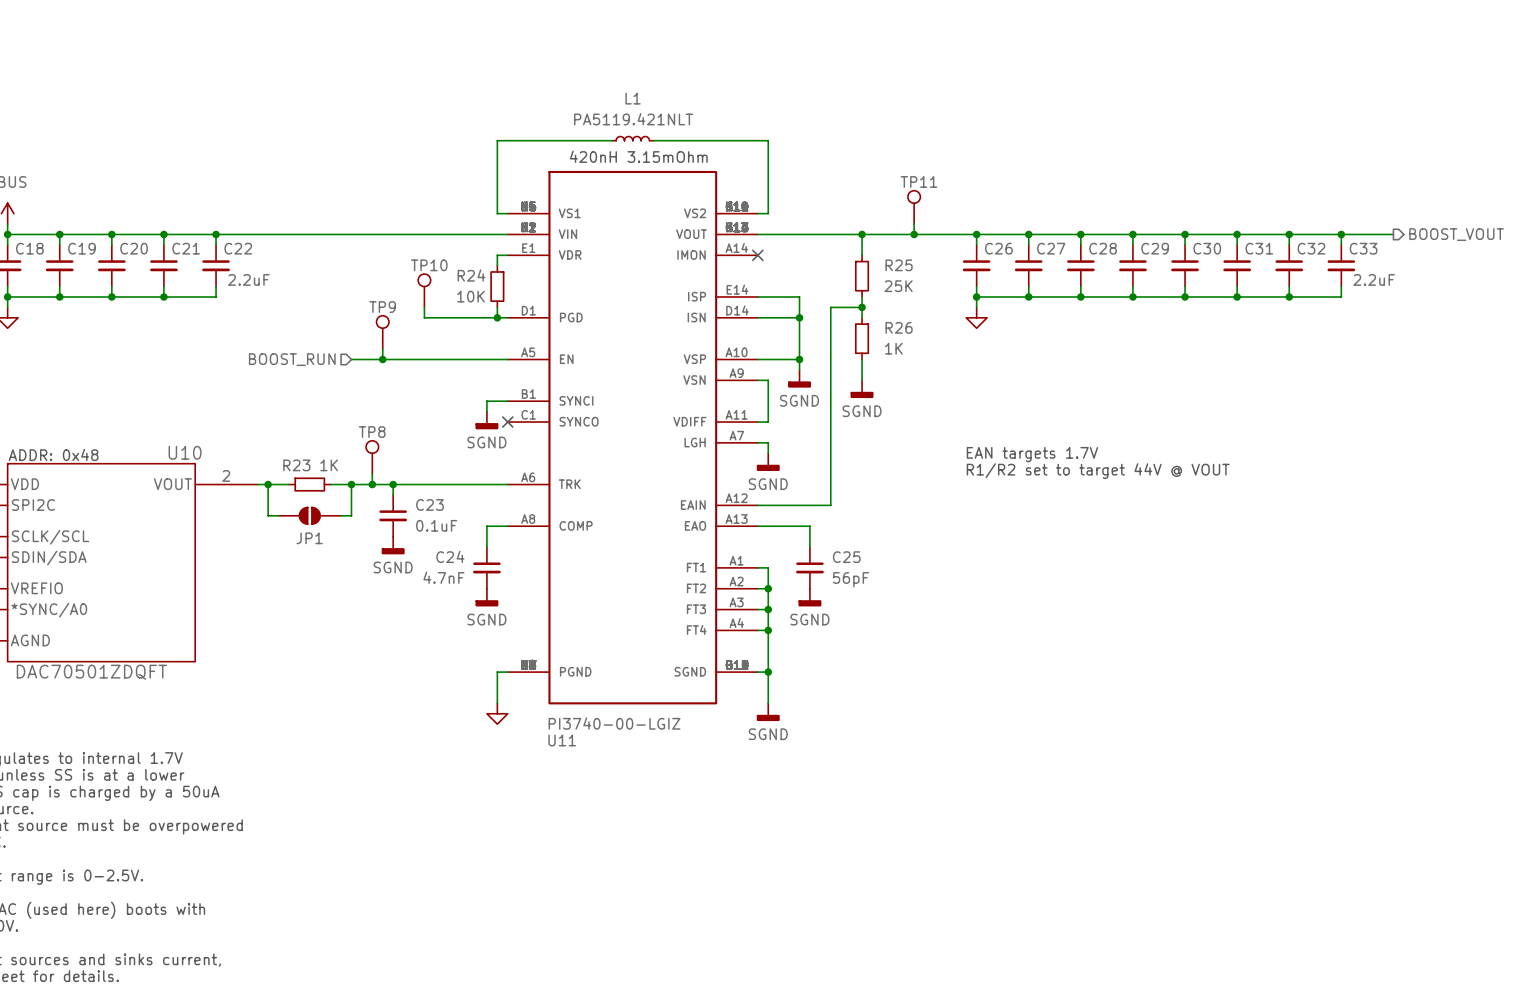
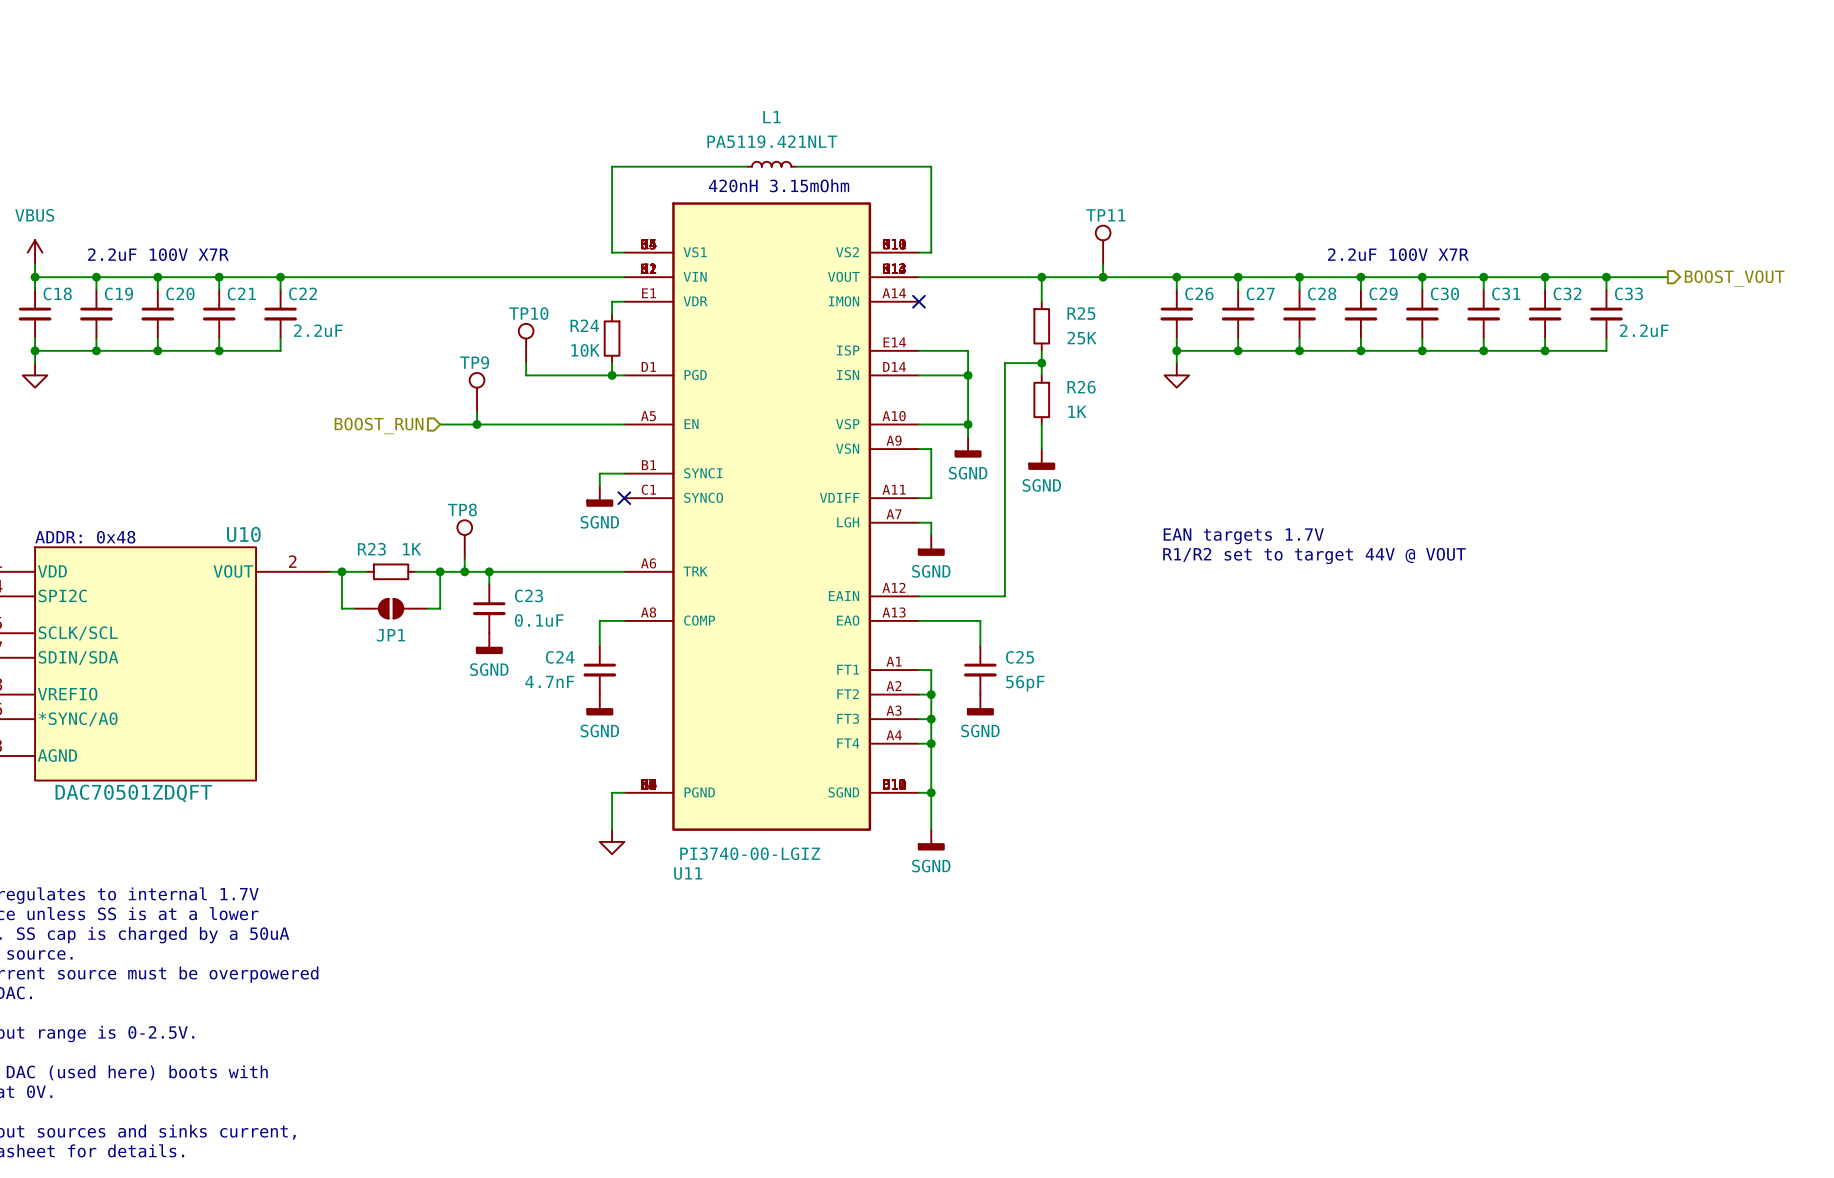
text: none -> 2.2uF 100V X7R (158, 254)
text: none -> 2.2uF 100V X7R (1398, 254)

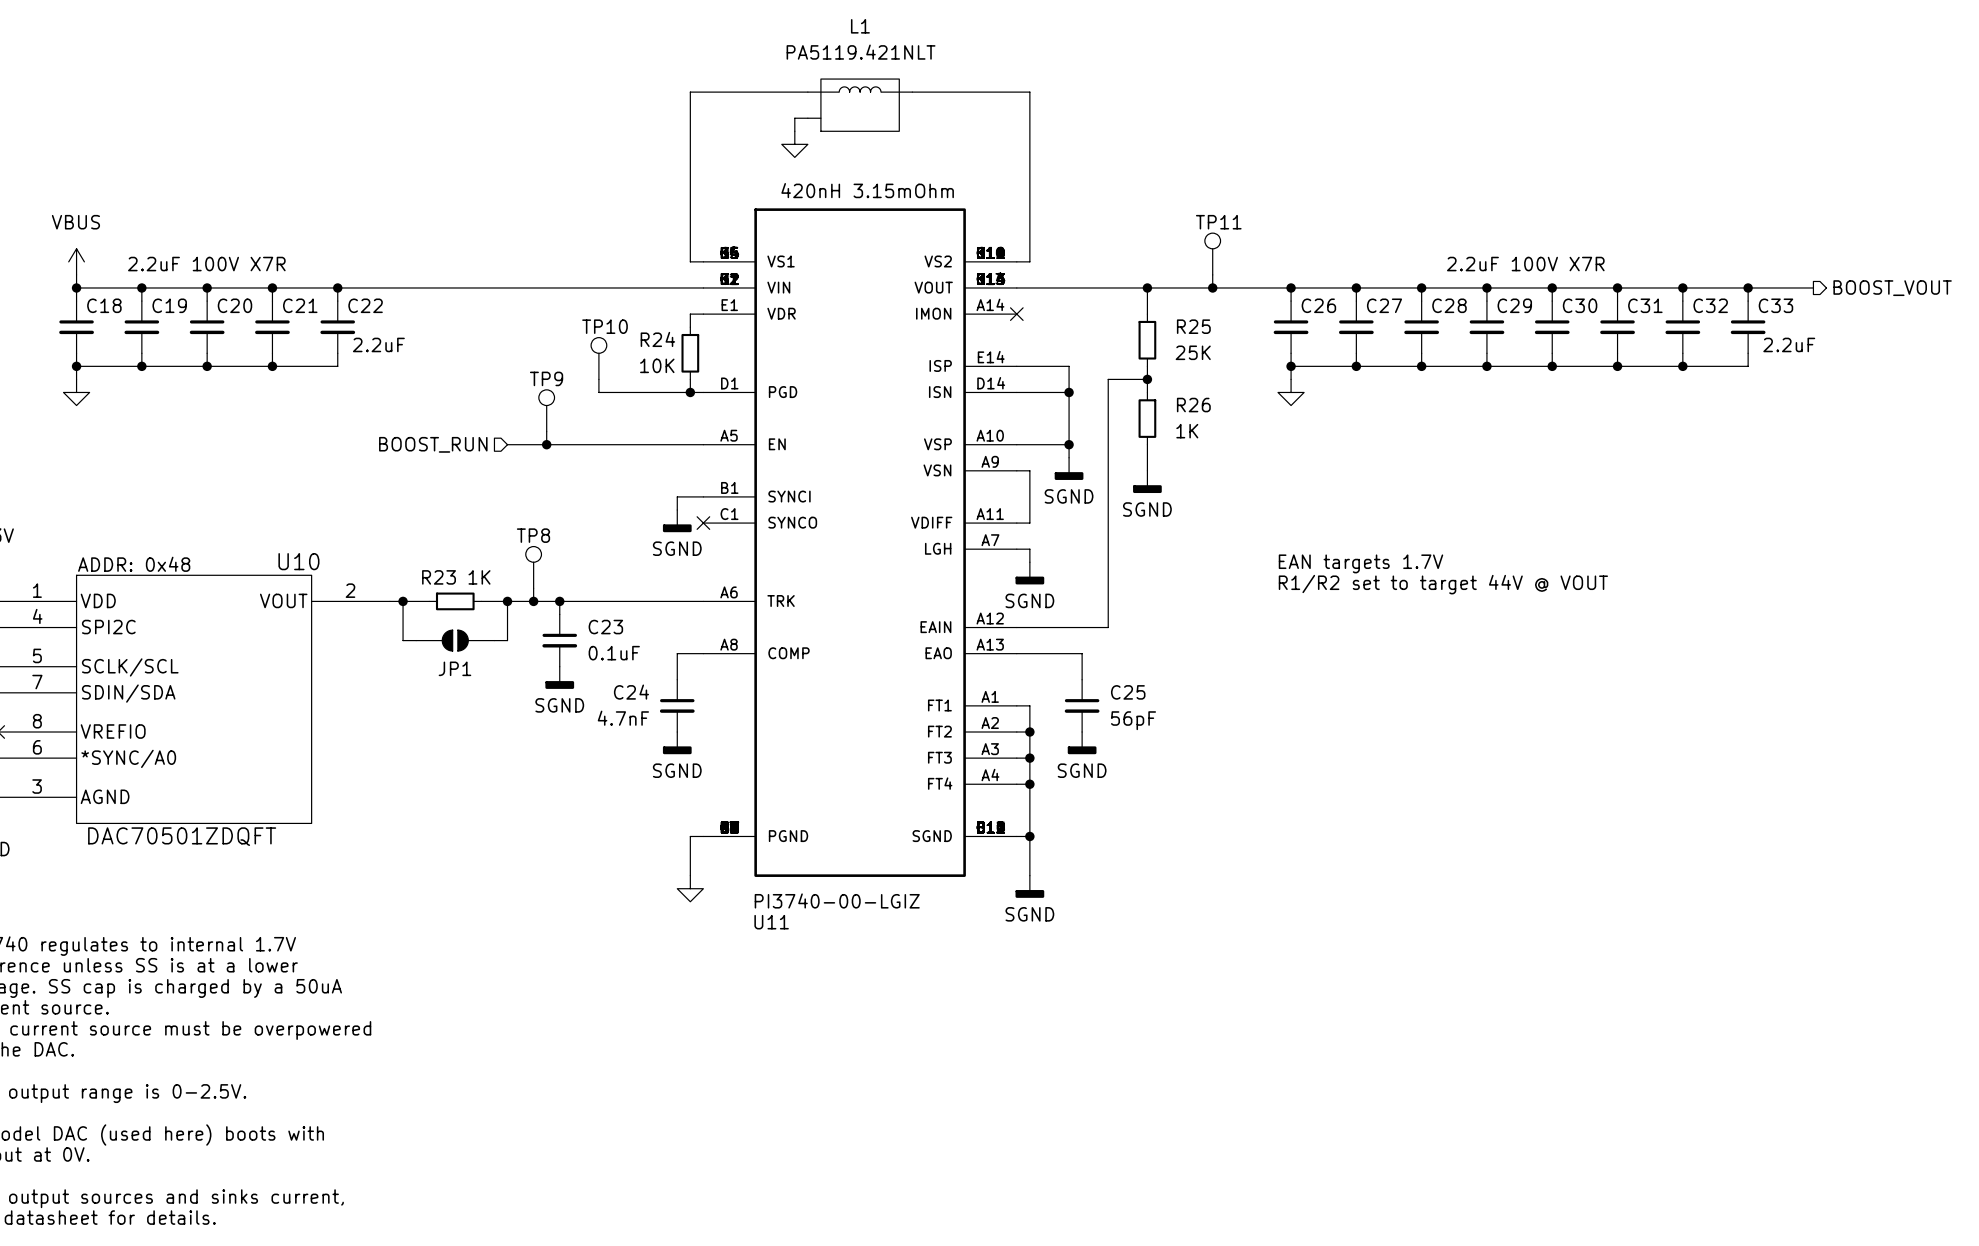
wire: none -> (807, 118) (794, 118) (794, 131)
L1 name position: L1 (771, 117) -> L1 (860, 26)
L1 value position: PA5119.421NLT (772, 141) -> PA5119.421NLT (861, 52)
power symbol: none -> (794, 144)
L1 symbol: [747, 161, 797, 167] -> [807, 79, 913, 132]
wire: (612, 166) (747, 166) -> (690, 170) (690, 92) (807, 92)
wire: (796, 166) (931, 166) -> (912, 92) (1029, 92) (1029, 170)

